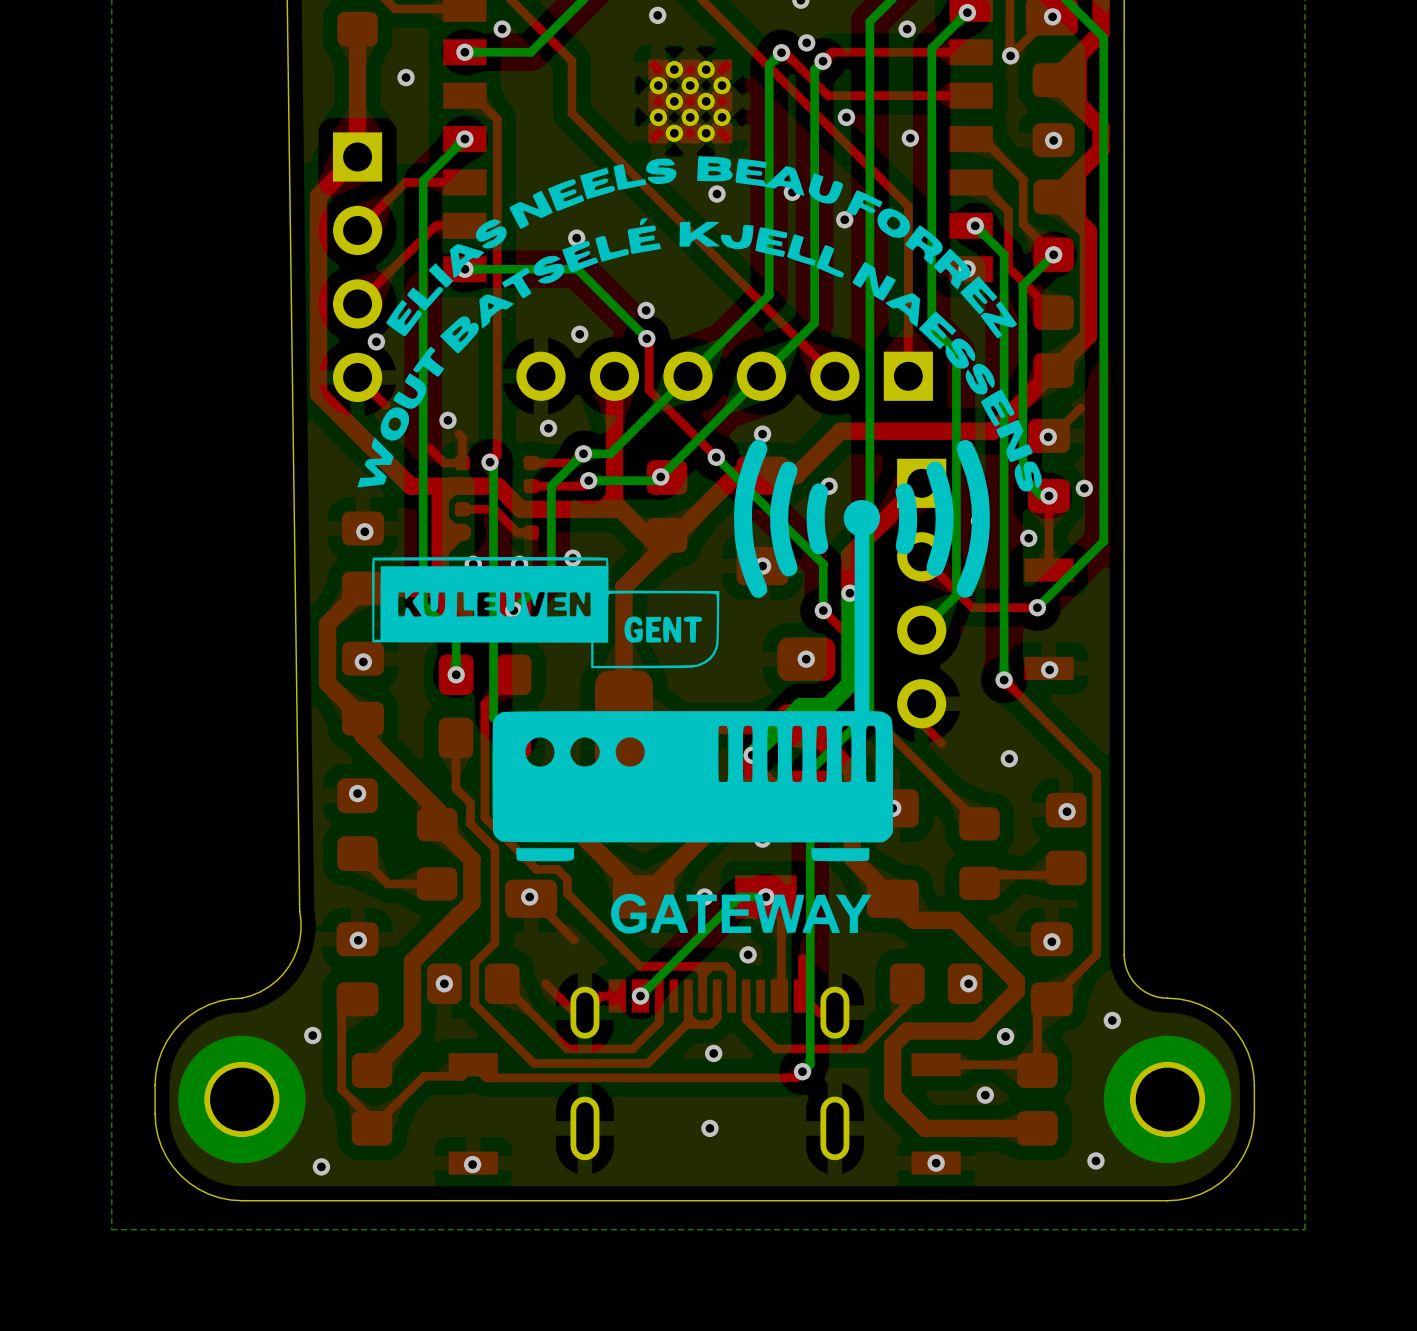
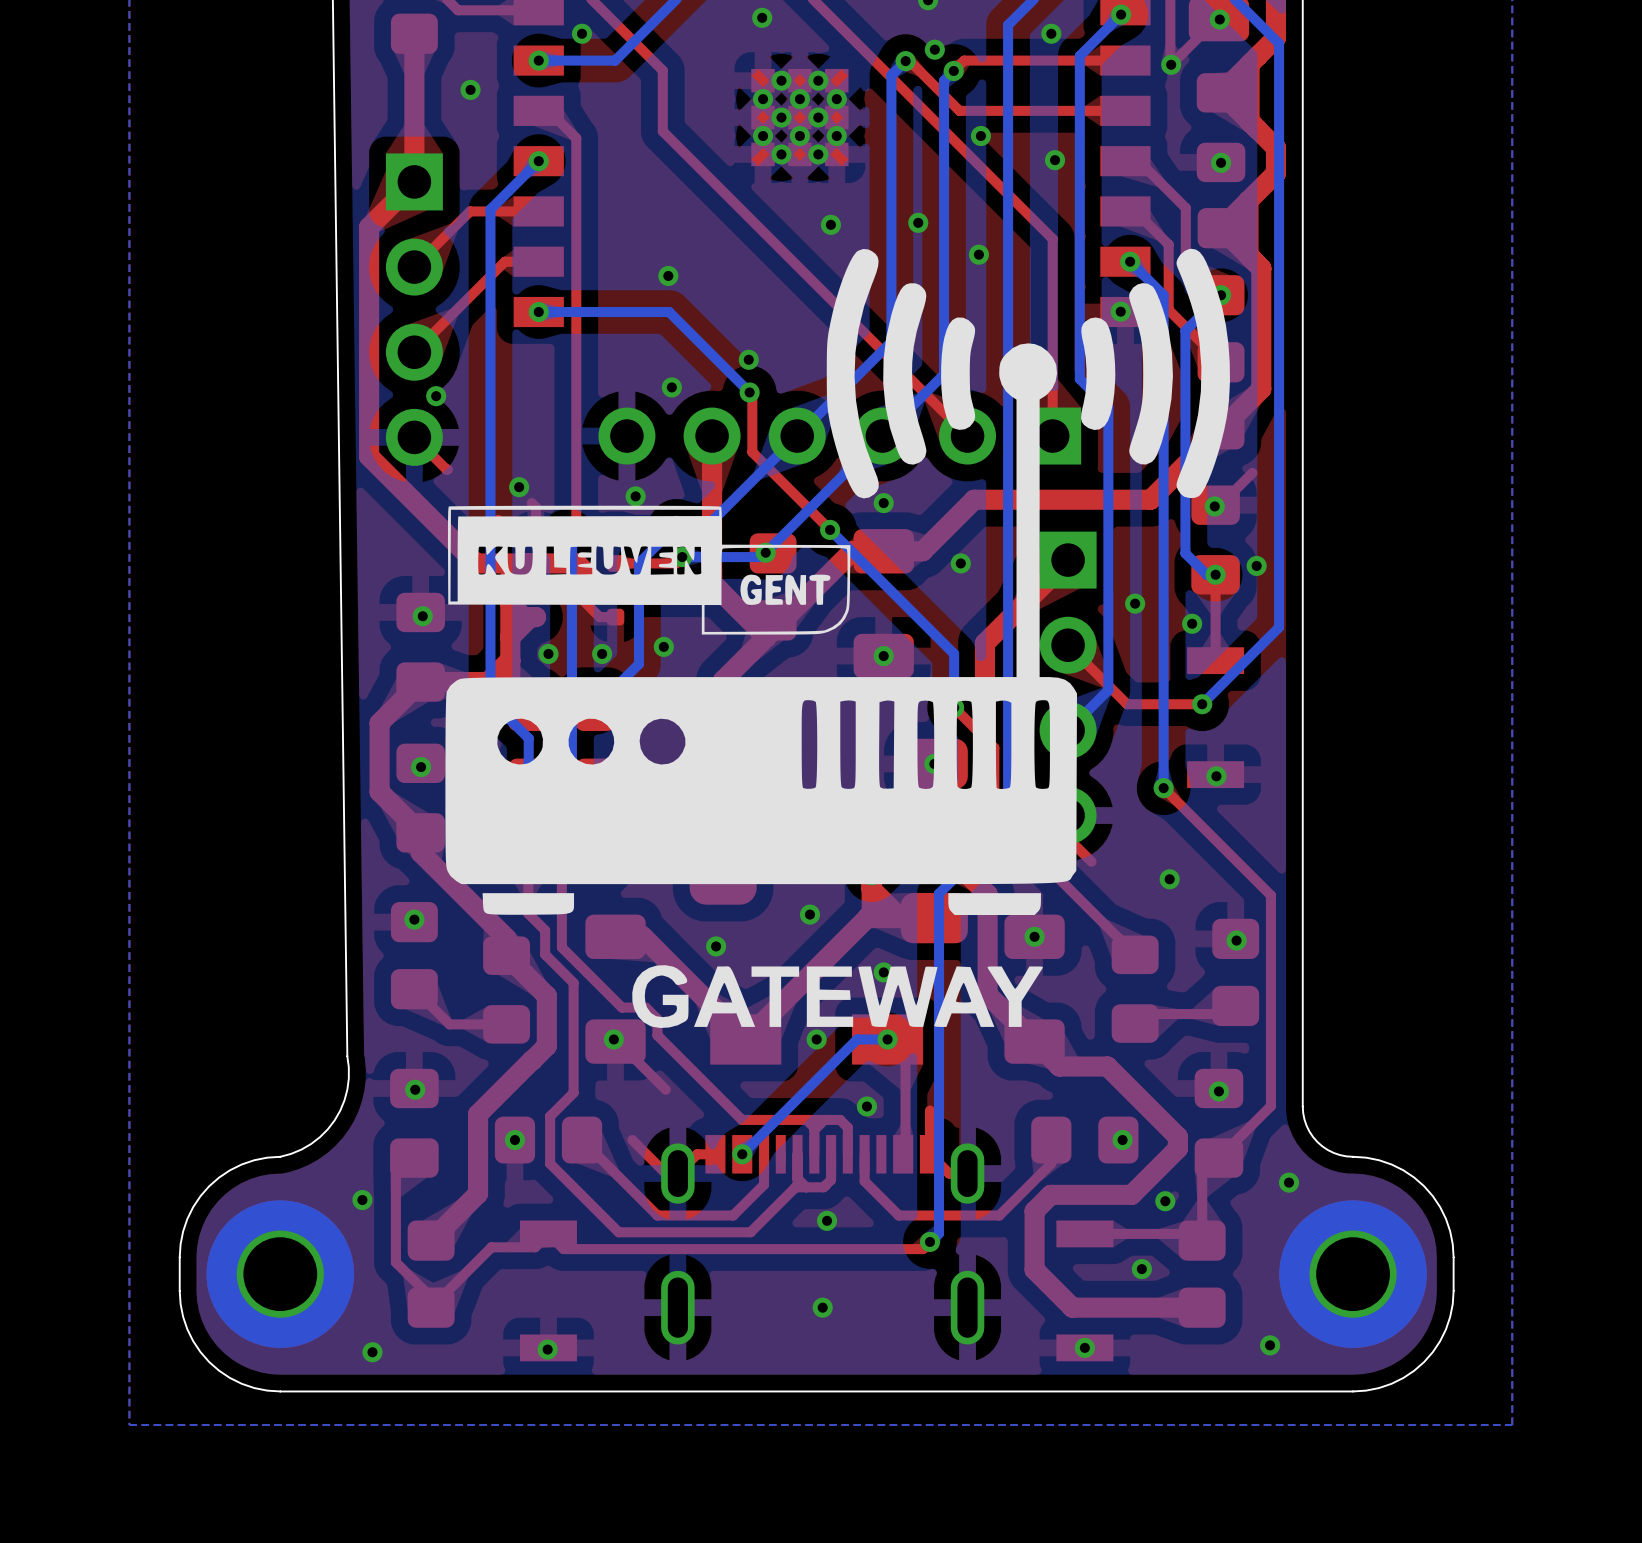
drawing: [357, 156, 1042, 934] -> none
drawing: none -> [445, 248, 1230, 1028]
drawing position: (545, 612) -> (649, 570)

